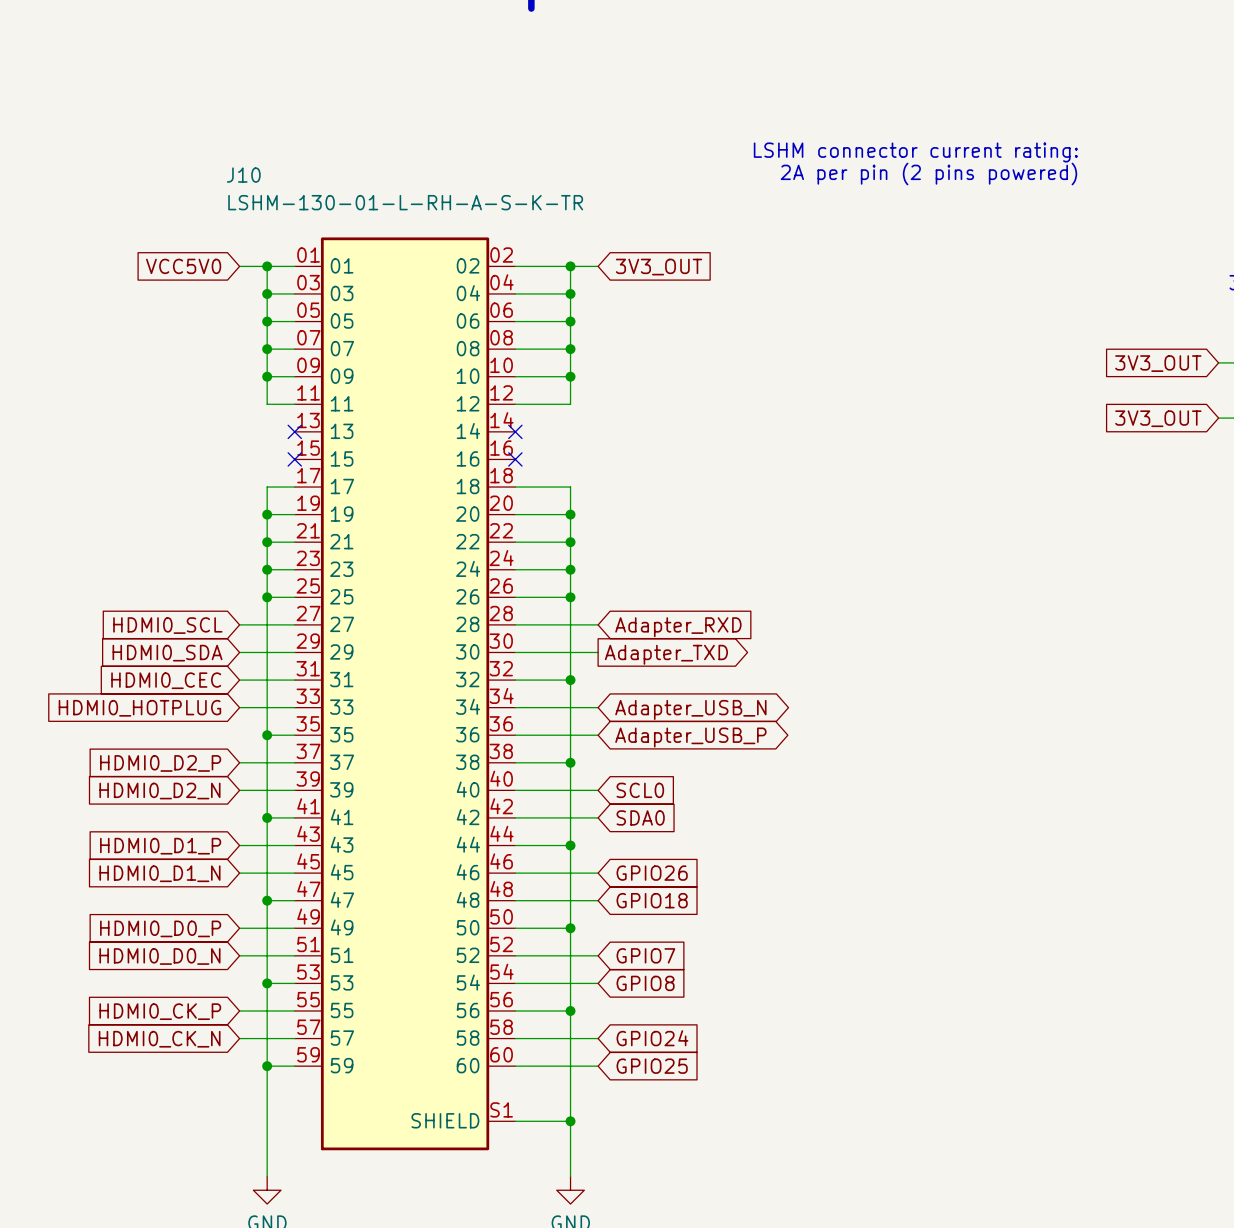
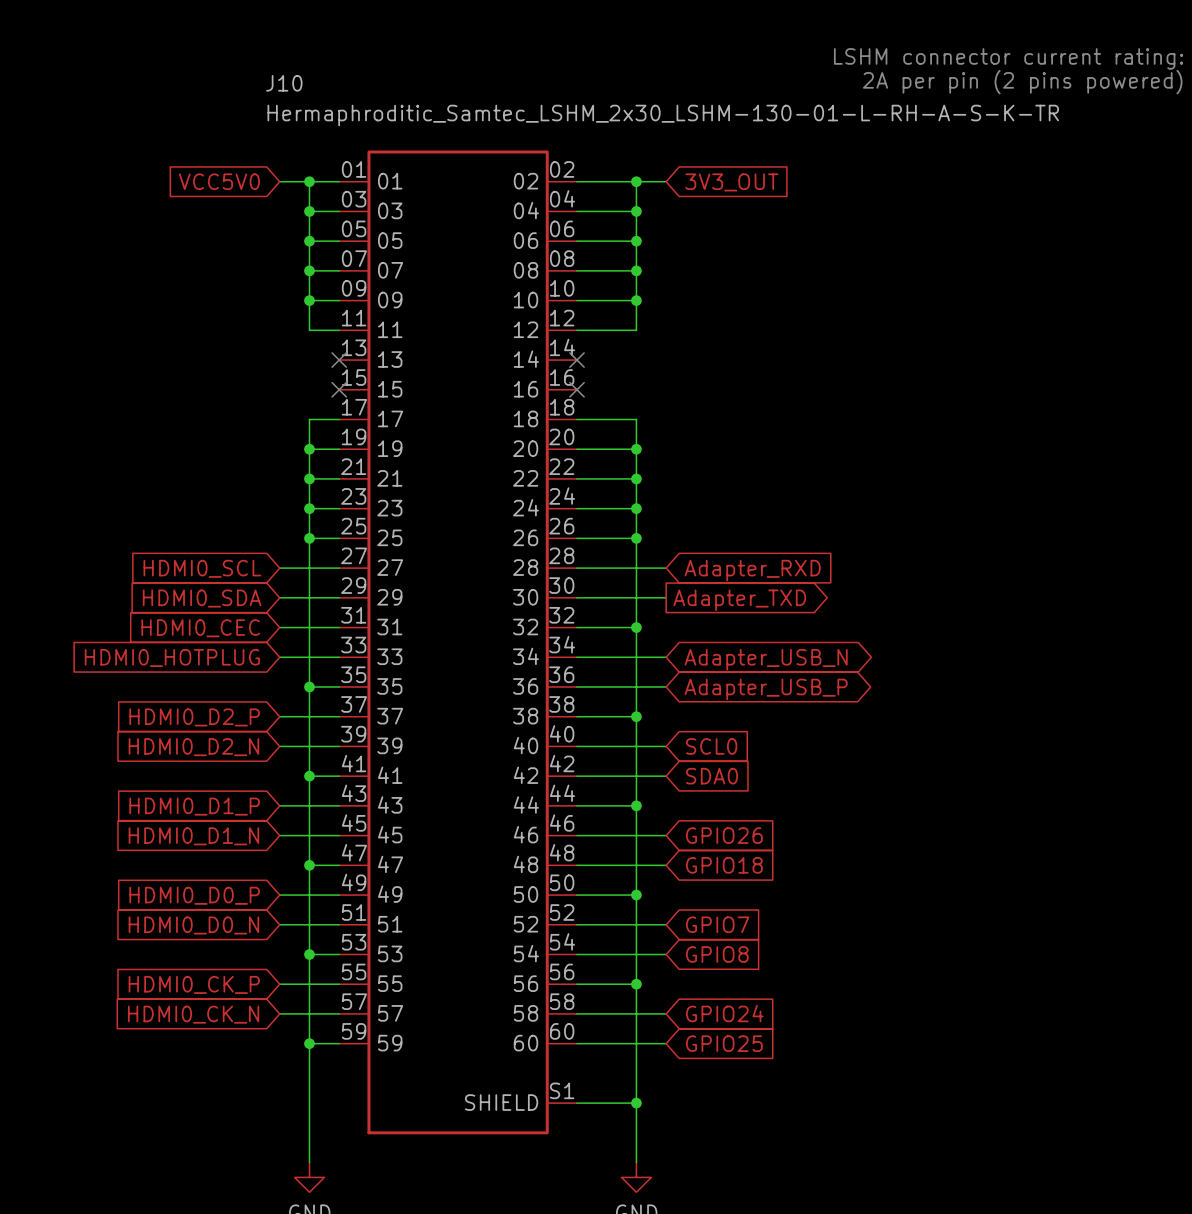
J10 value: LSHM-130-01-L-RH-A-S-K-TR (405, 202) -> Hermaphroditic_Samtec_LSHM_2x30_LSHM-130-01-L-RH-A-S-K-TR (663, 115)

